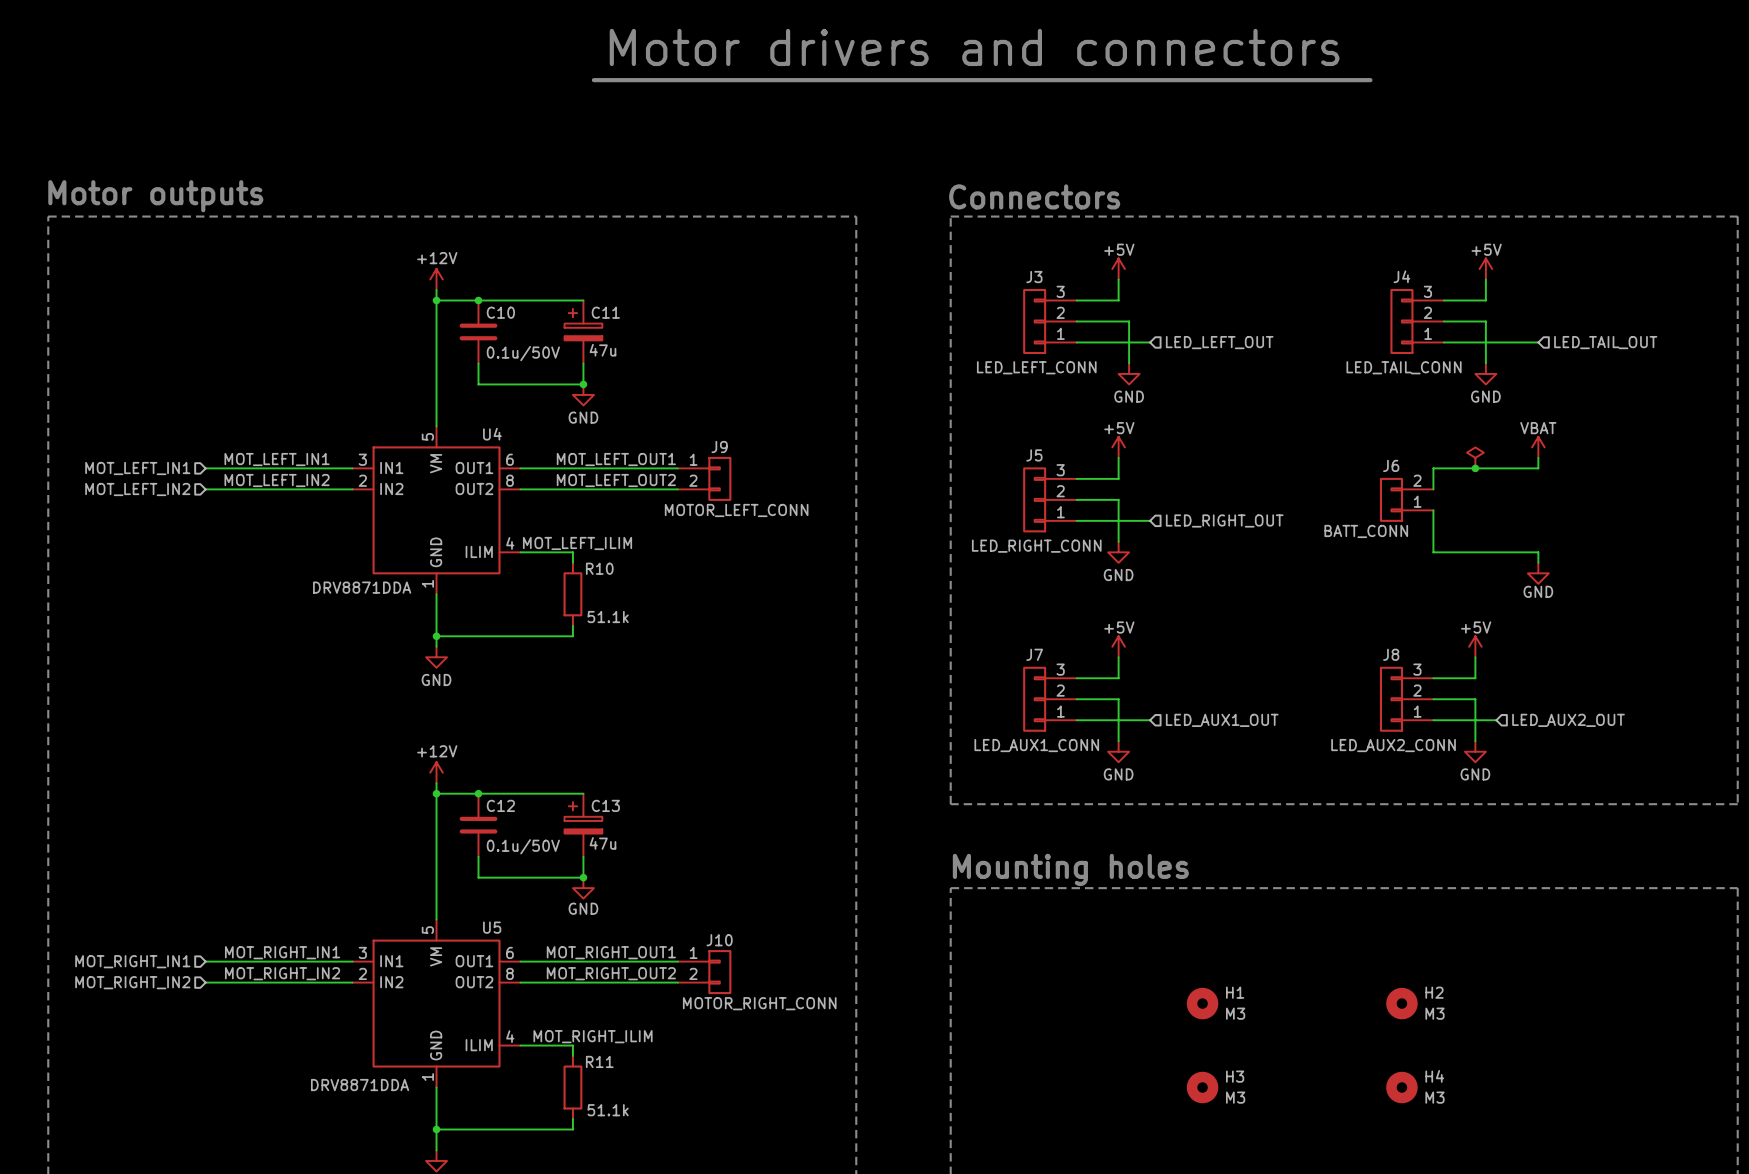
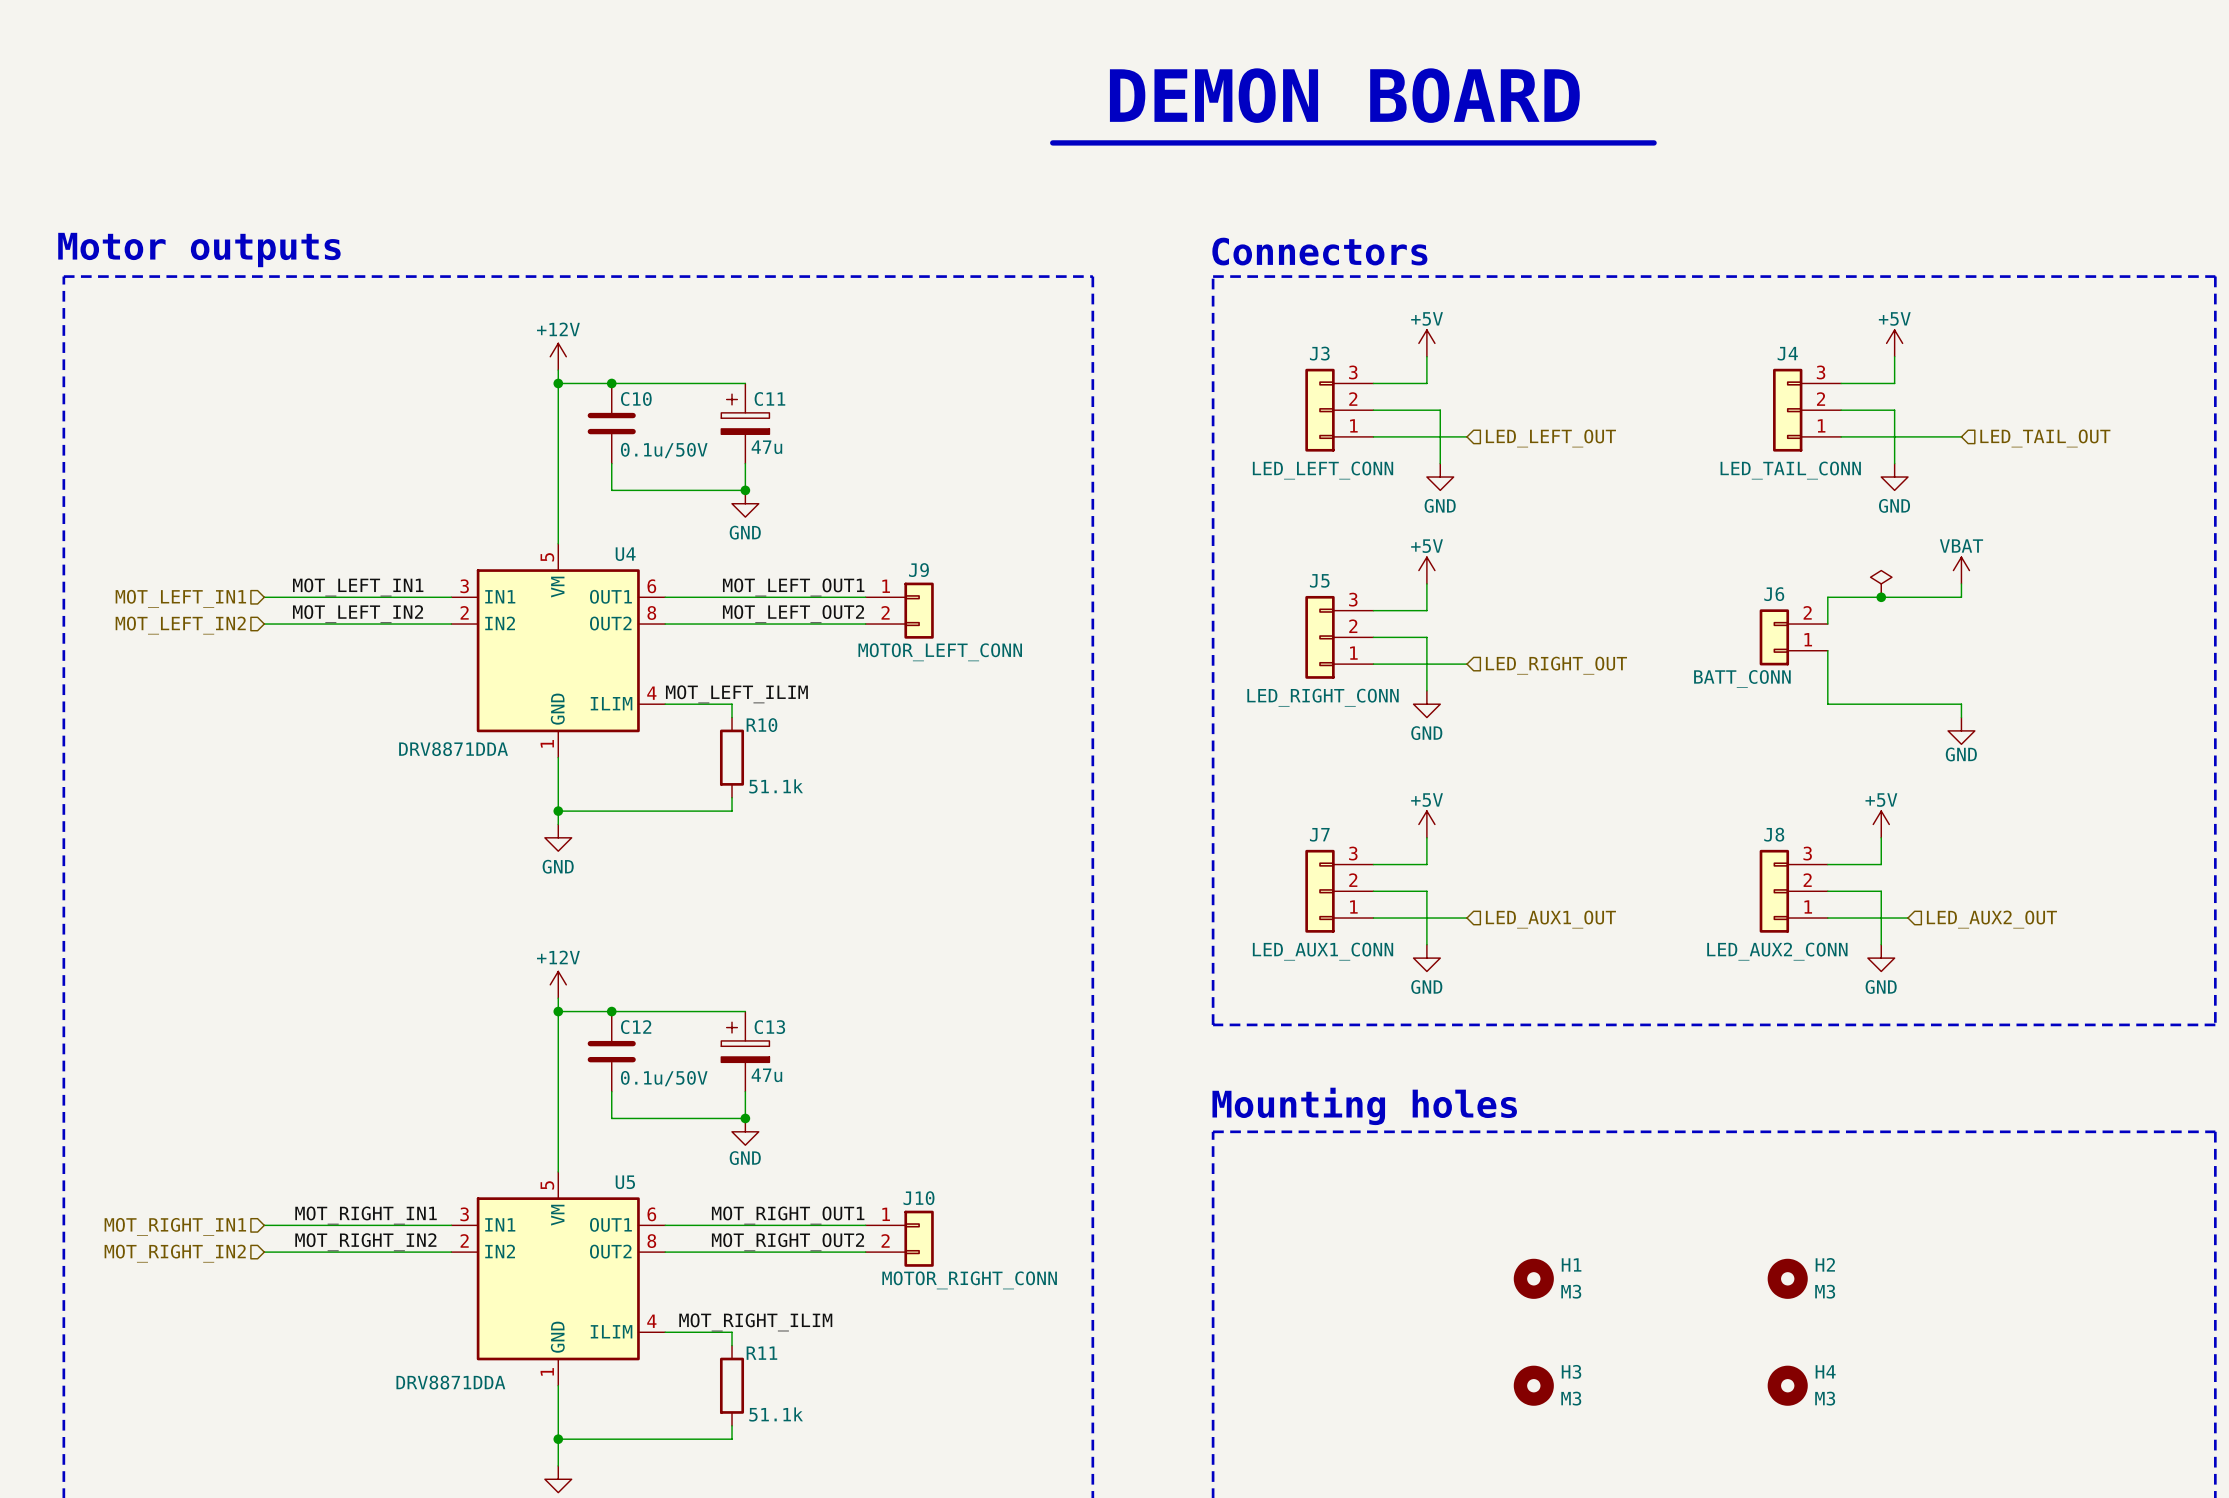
text: Motor drivers and connectors (974, 47) -> none
text: none -> DEMON BOARD (1344, 95)
line: (593, 80) (1370, 80) -> none
line: none -> (1052, 142) (1654, 142)

